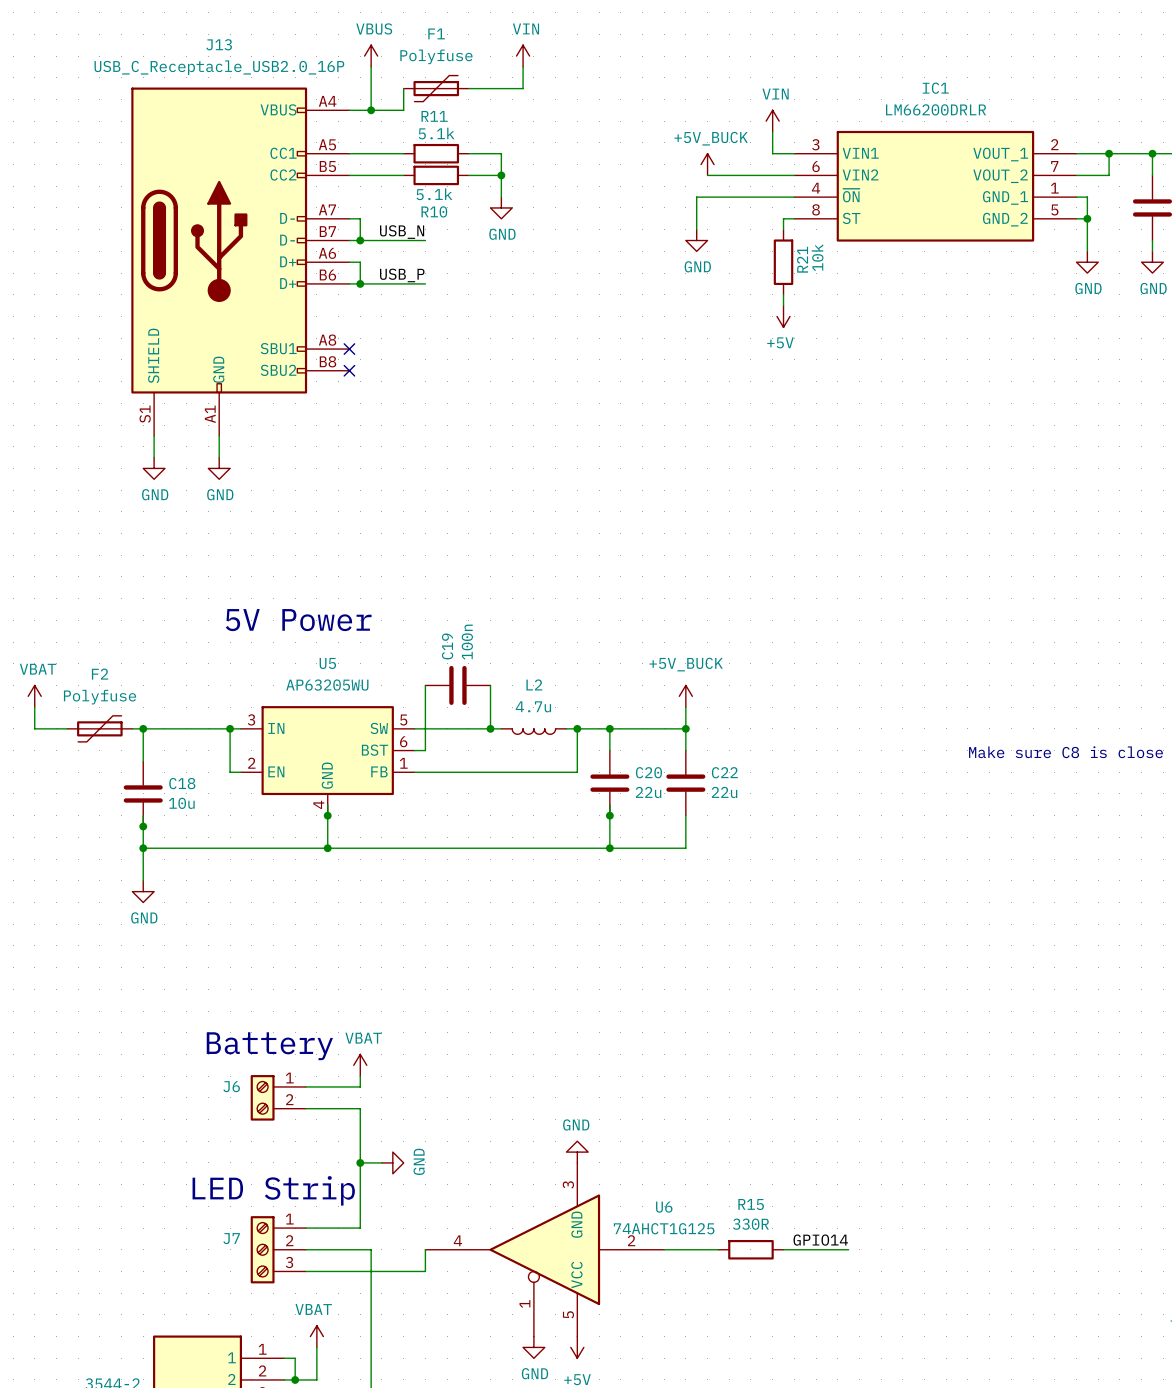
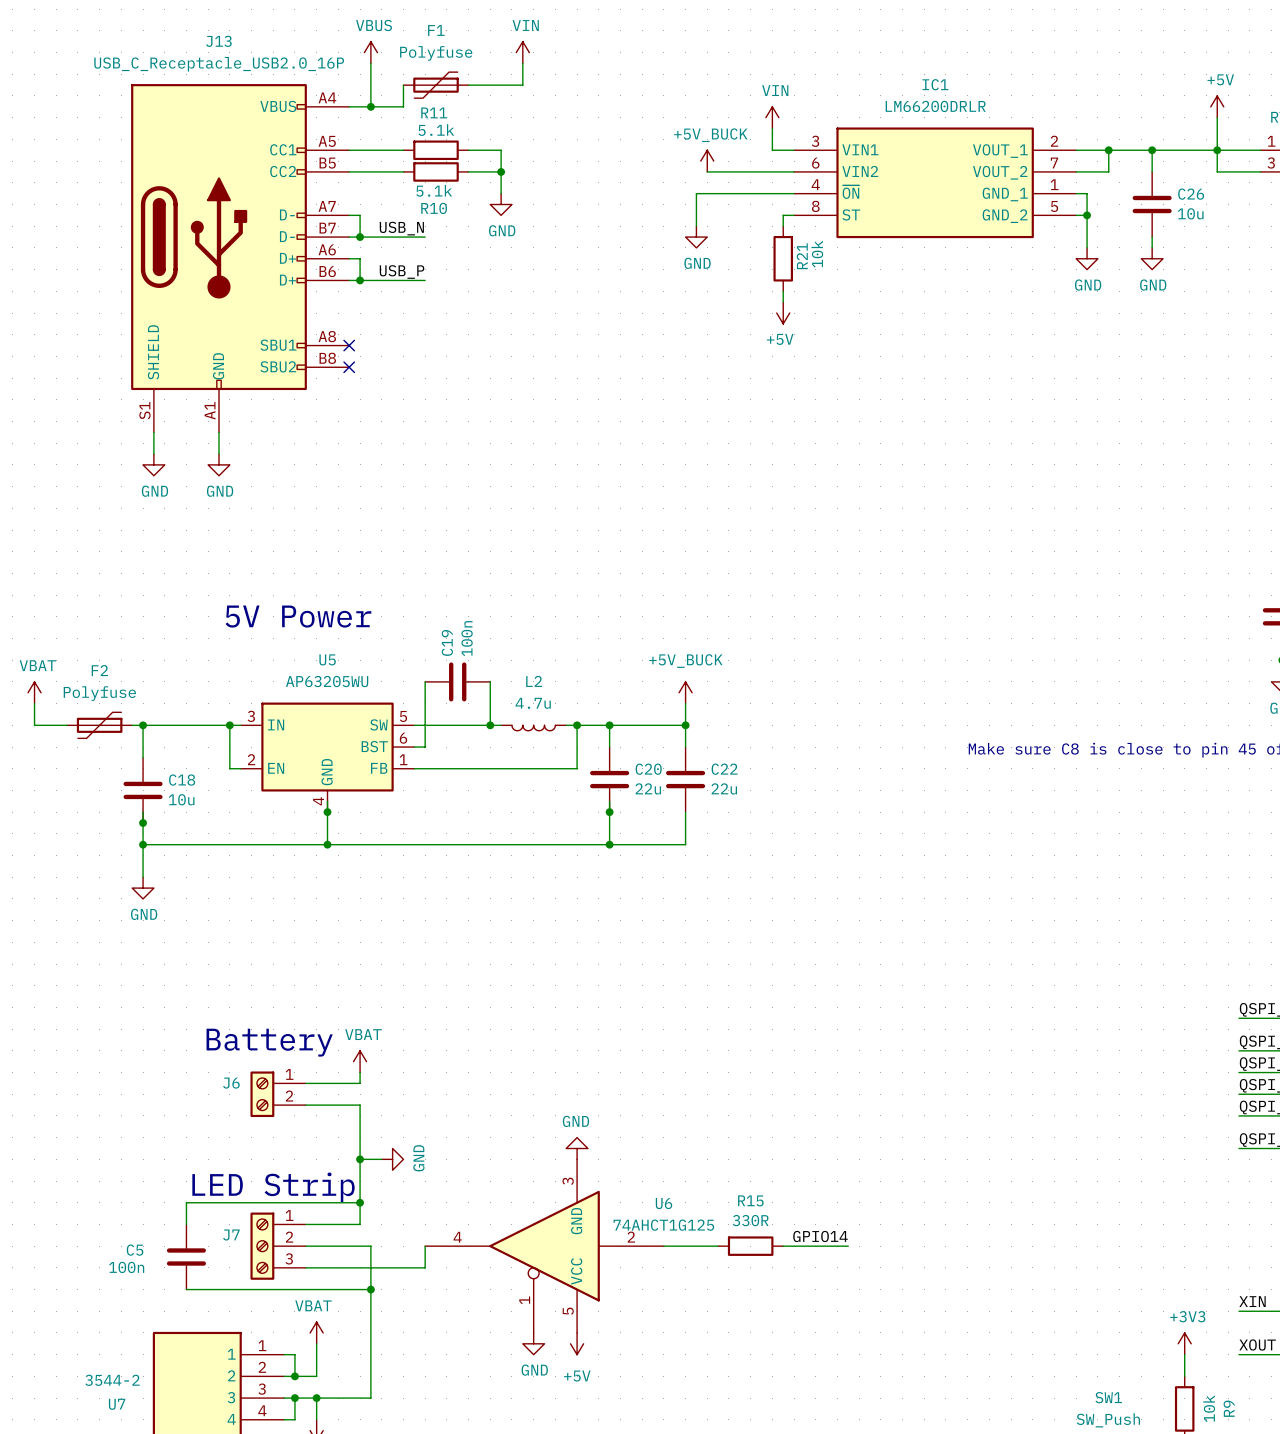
wire: none -> (360, 1202) (186, 1202) (186, 1224)
junction: none -> (360, 1202)
C5: none -> 100n (186, 1257)
wire: none -> (186, 1289) (370, 1289)
junction: none -> (370, 1289)

